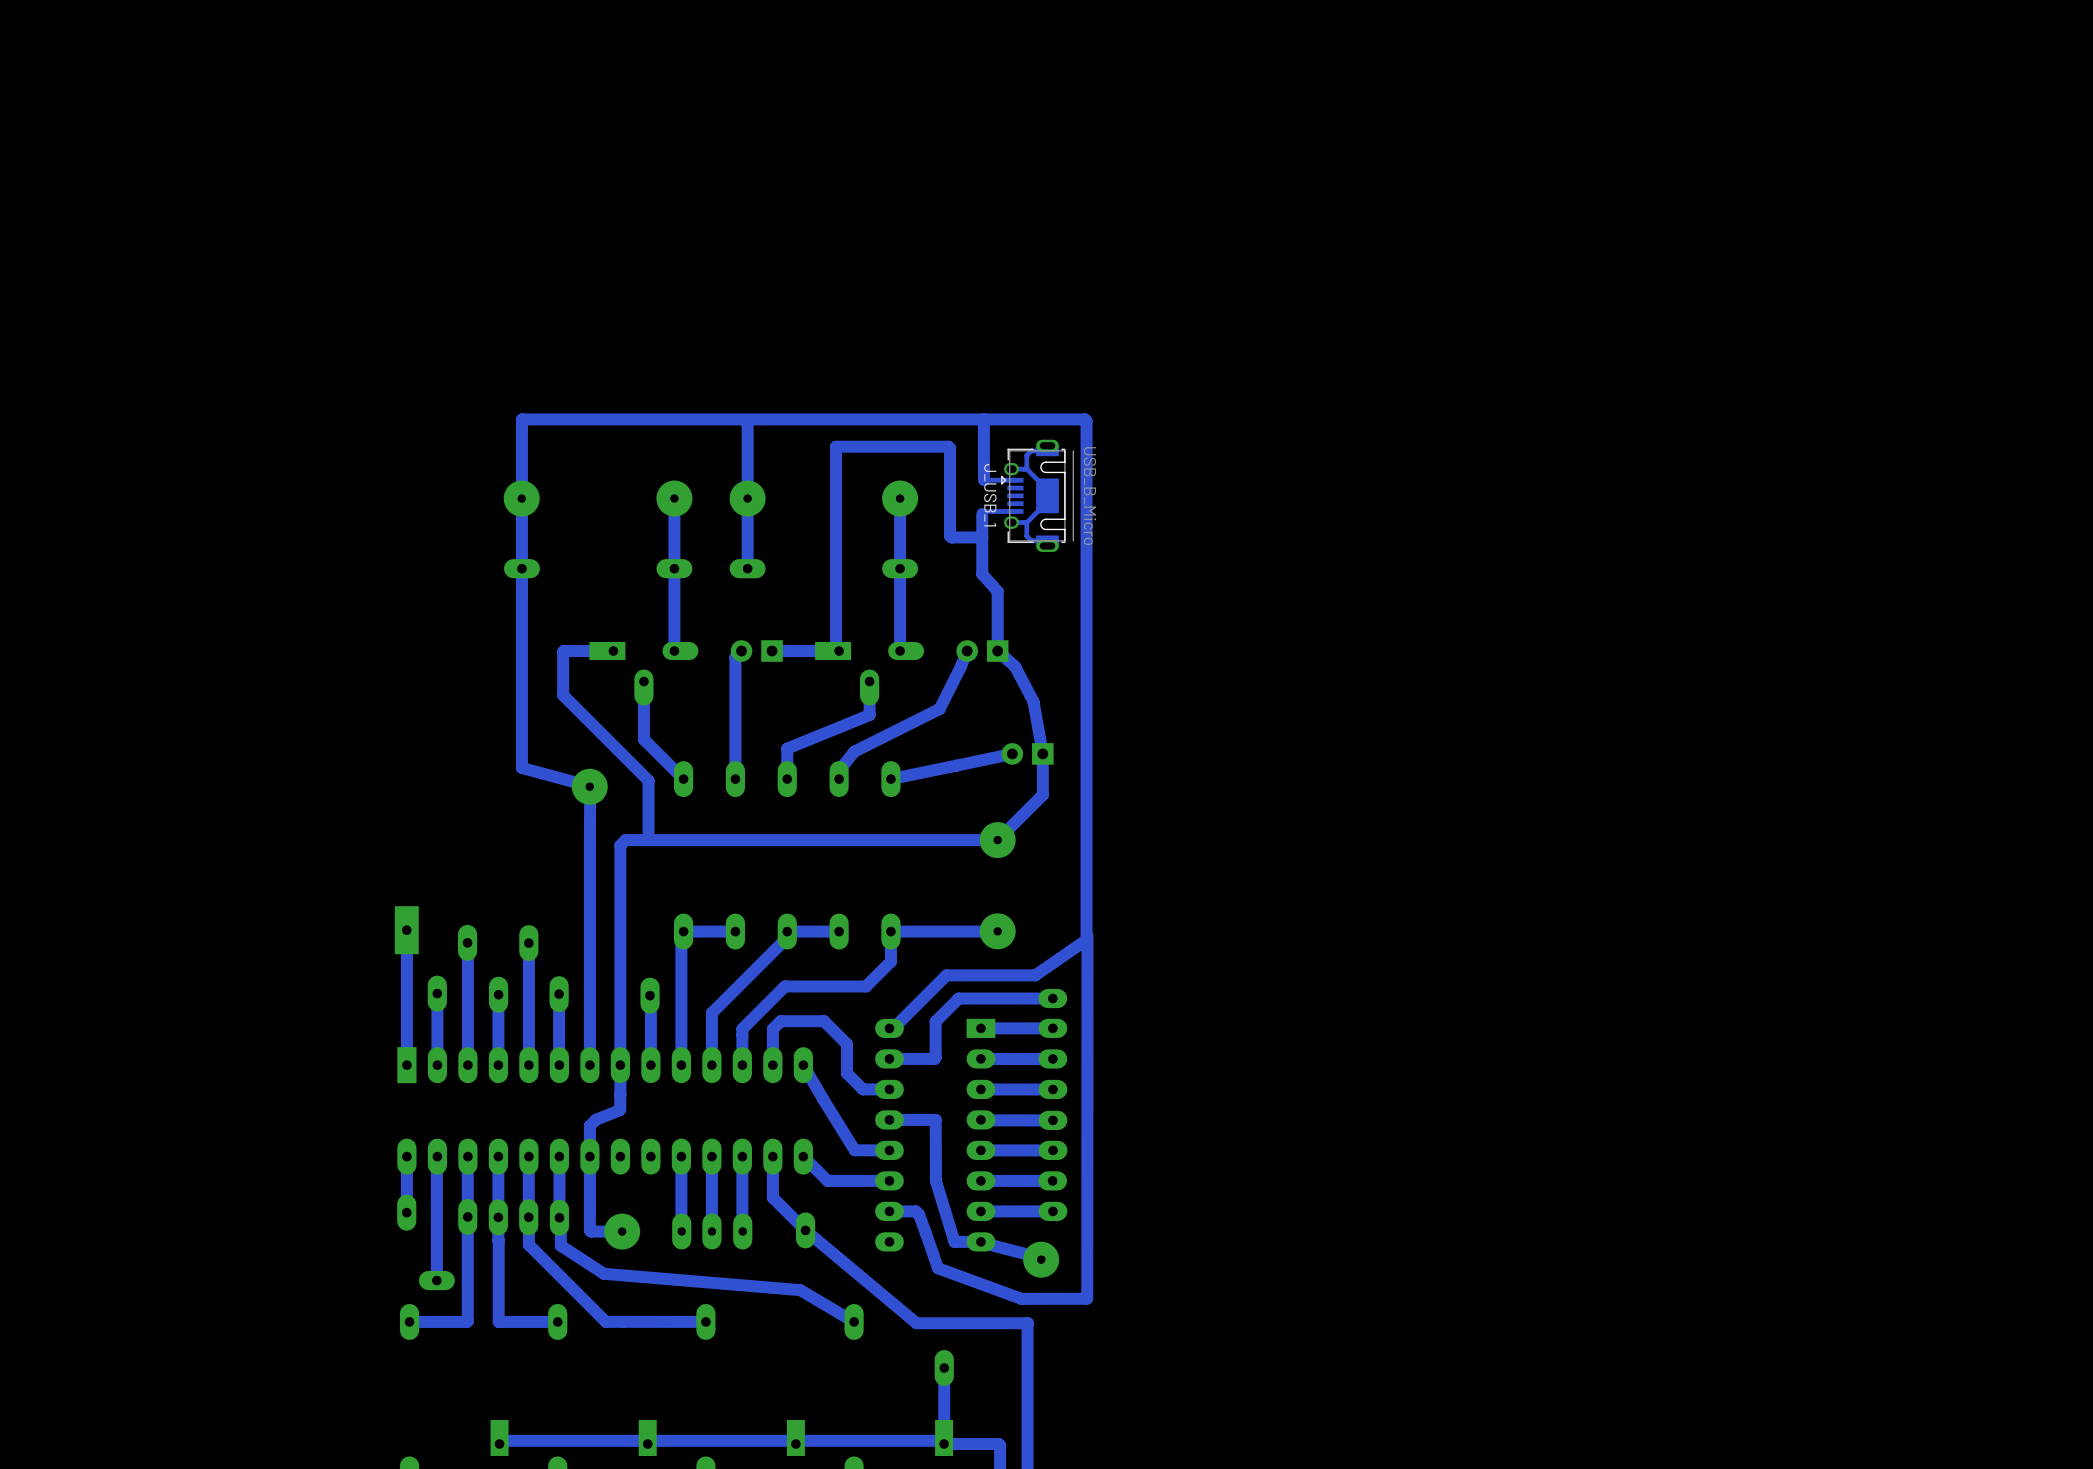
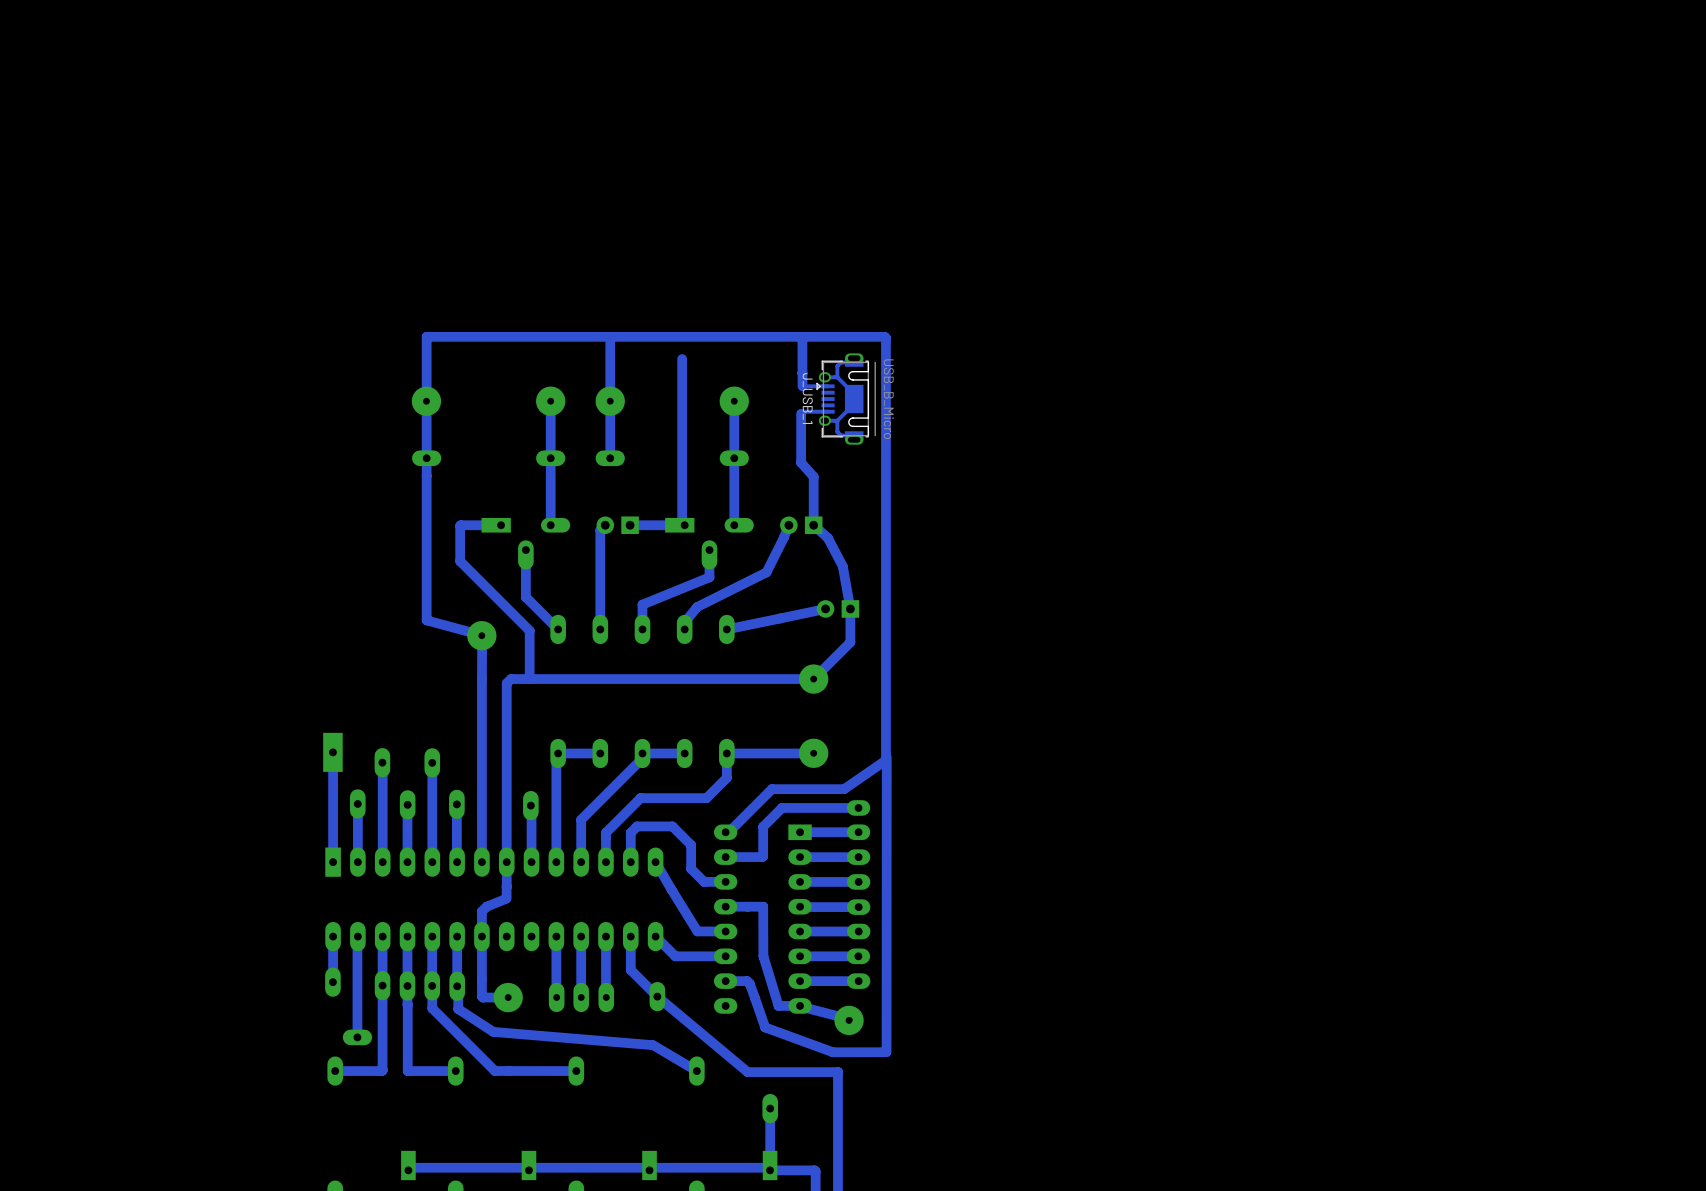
track: (836, 446) (948, 446) (949, 535) (951, 537) (982, 537) -> none

